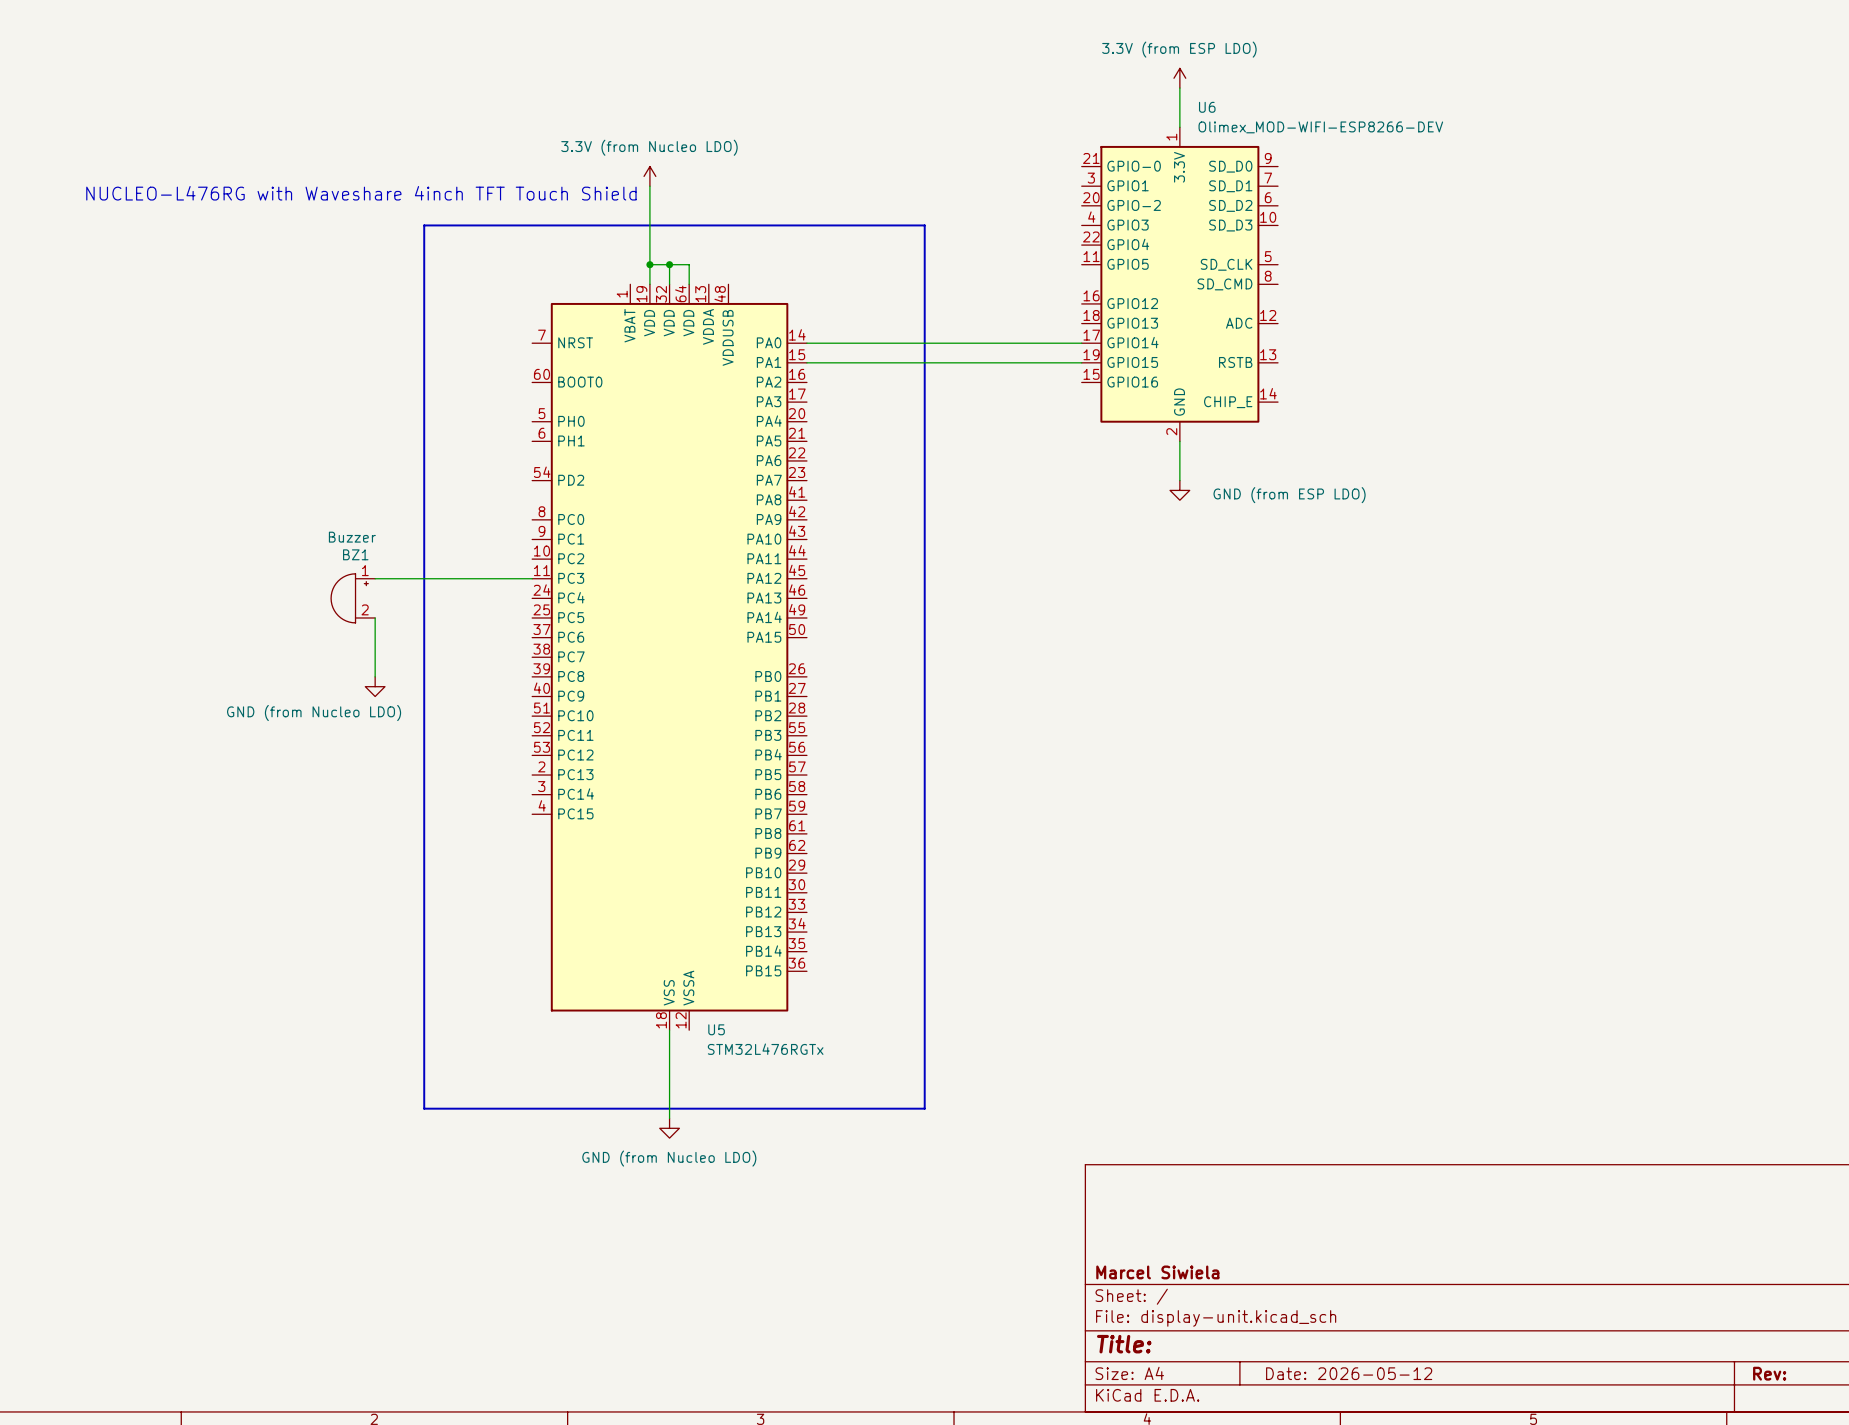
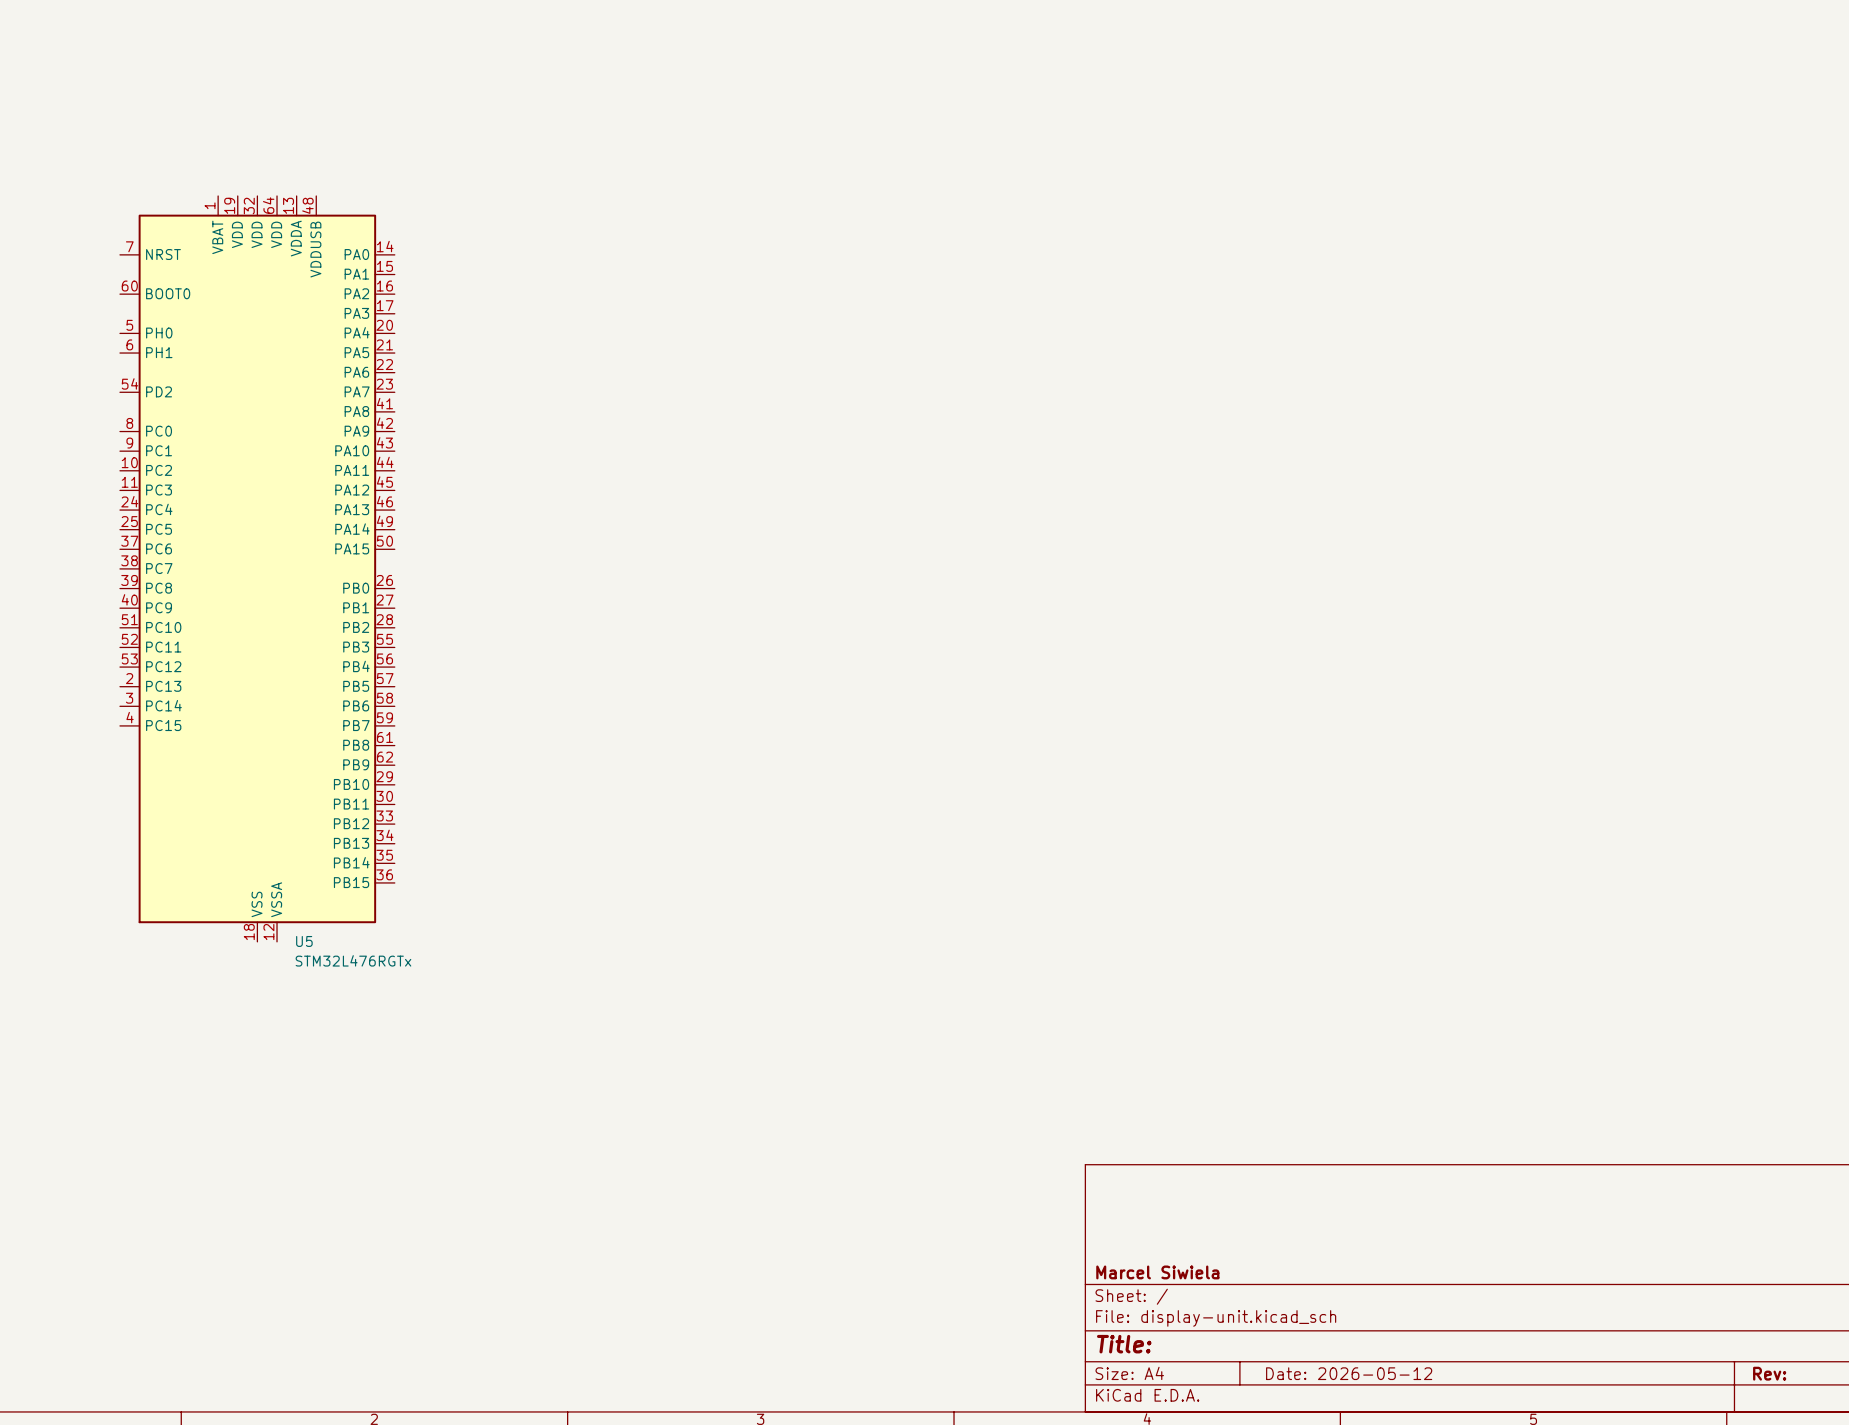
power symbol: 3.3V (from ESP LDO) (1179, 78) -> none
wire: (1179, 88) (1179, 127) -> none
power symbol: 3.3V (from Nucleo LDO) (649, 176) -> none
wire: (649, 186) (649, 284) -> none
text: NUCLEO-L476RG with Waveshare 4inch TFT Touch Shield (361, 193) -> none
line: (424, 225) (924, 225) (924, 1108) (424, 1108) (424, 225) -> none
wire: (649, 264) (689, 264) (689, 284) -> none
junction: (649, 264) -> none
wire: (669, 264) (669, 284) -> none
junction: (669, 264) -> none
U6: Olimex_MOD-WIFI-ESP8266-DEV (1179, 284) -> none
wire: (806, 343) (1081, 343) -> none
wire: (806, 362) (1081, 362) -> none
wire: (1179, 441) (1179, 480) -> none
power symbol: GND (from ESP LDO) (1179, 490) -> none
wire: (375, 578) (532, 578) -> none
BZ1: Buzzer (353, 598) -> none
U5 position: (669, 657) -> (257, 568)
power symbol: GND (from Nucleo LDO) (375, 686) -> none
wire: (669, 1030) (669, 1118) -> none
power symbol: GND (from Nucleo LDO) (669, 1128) -> none

